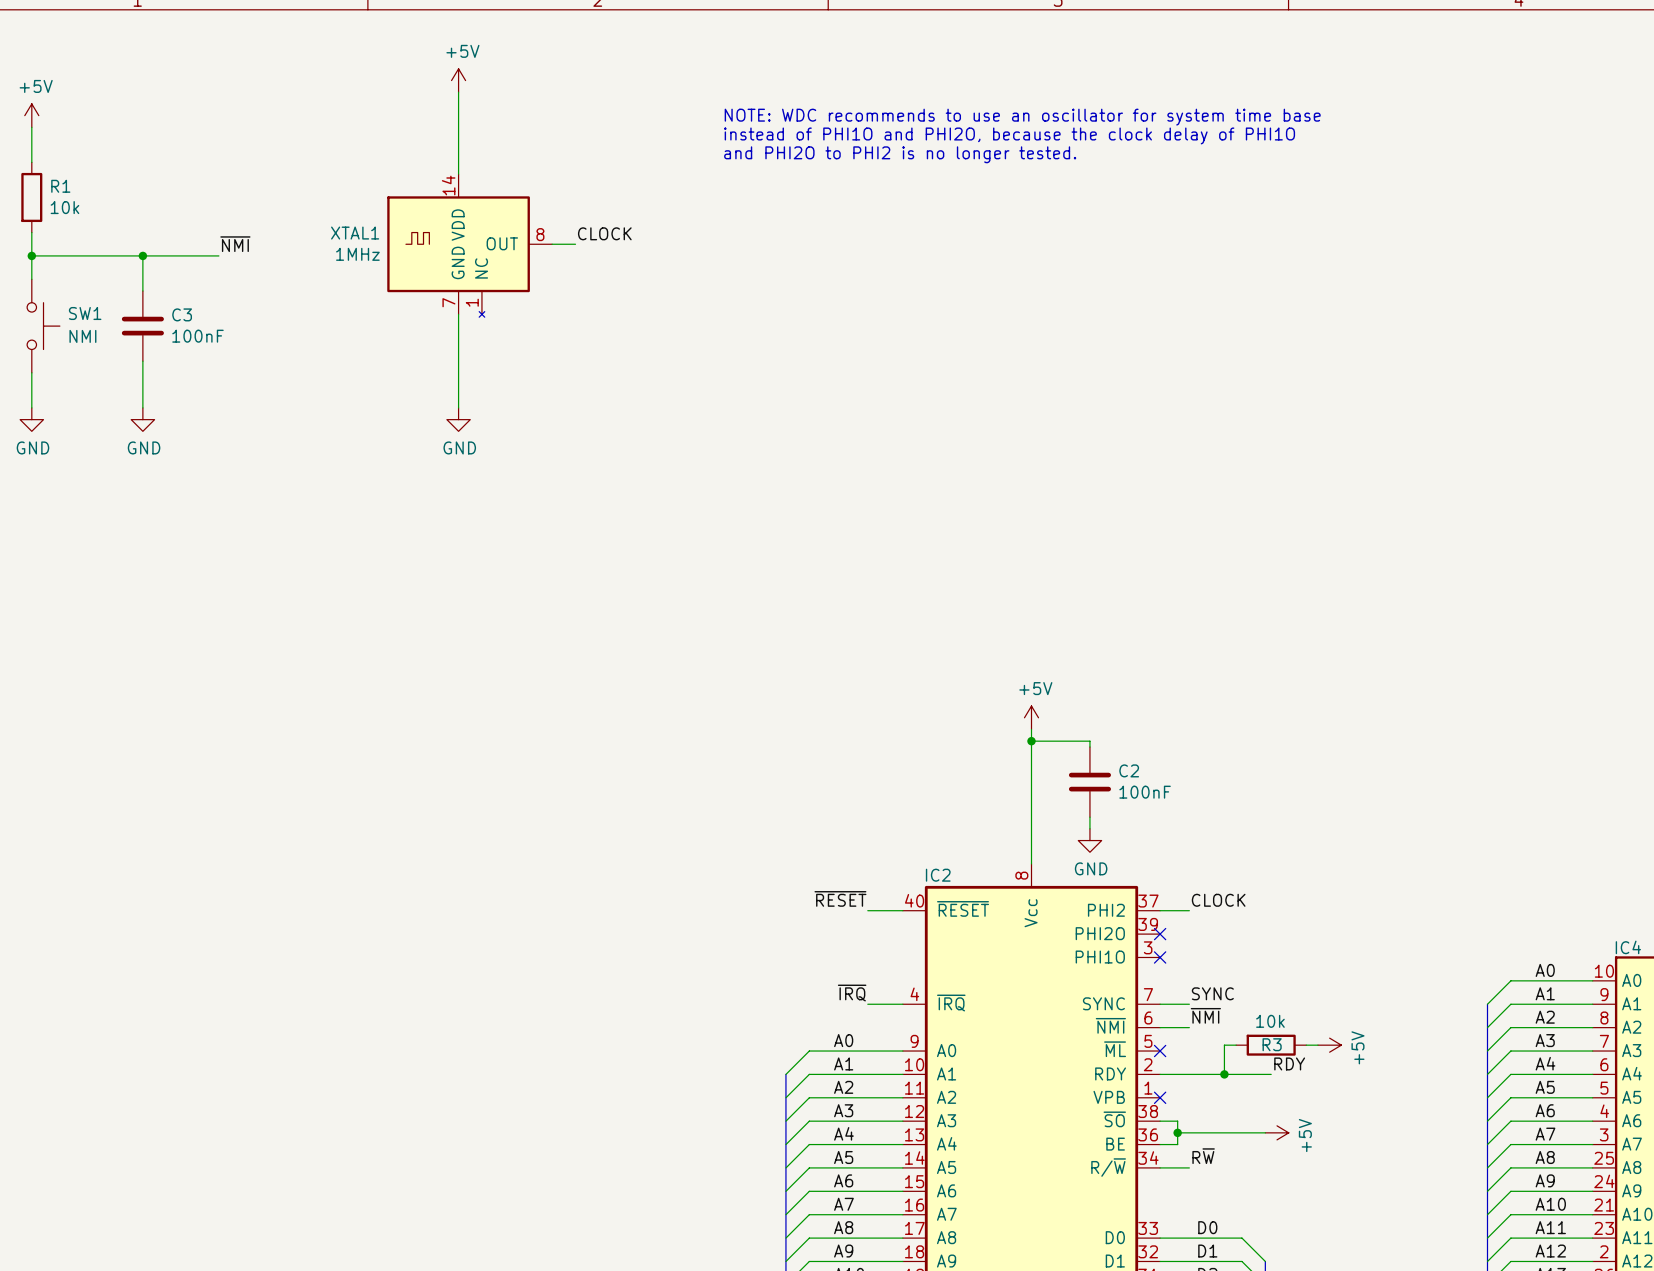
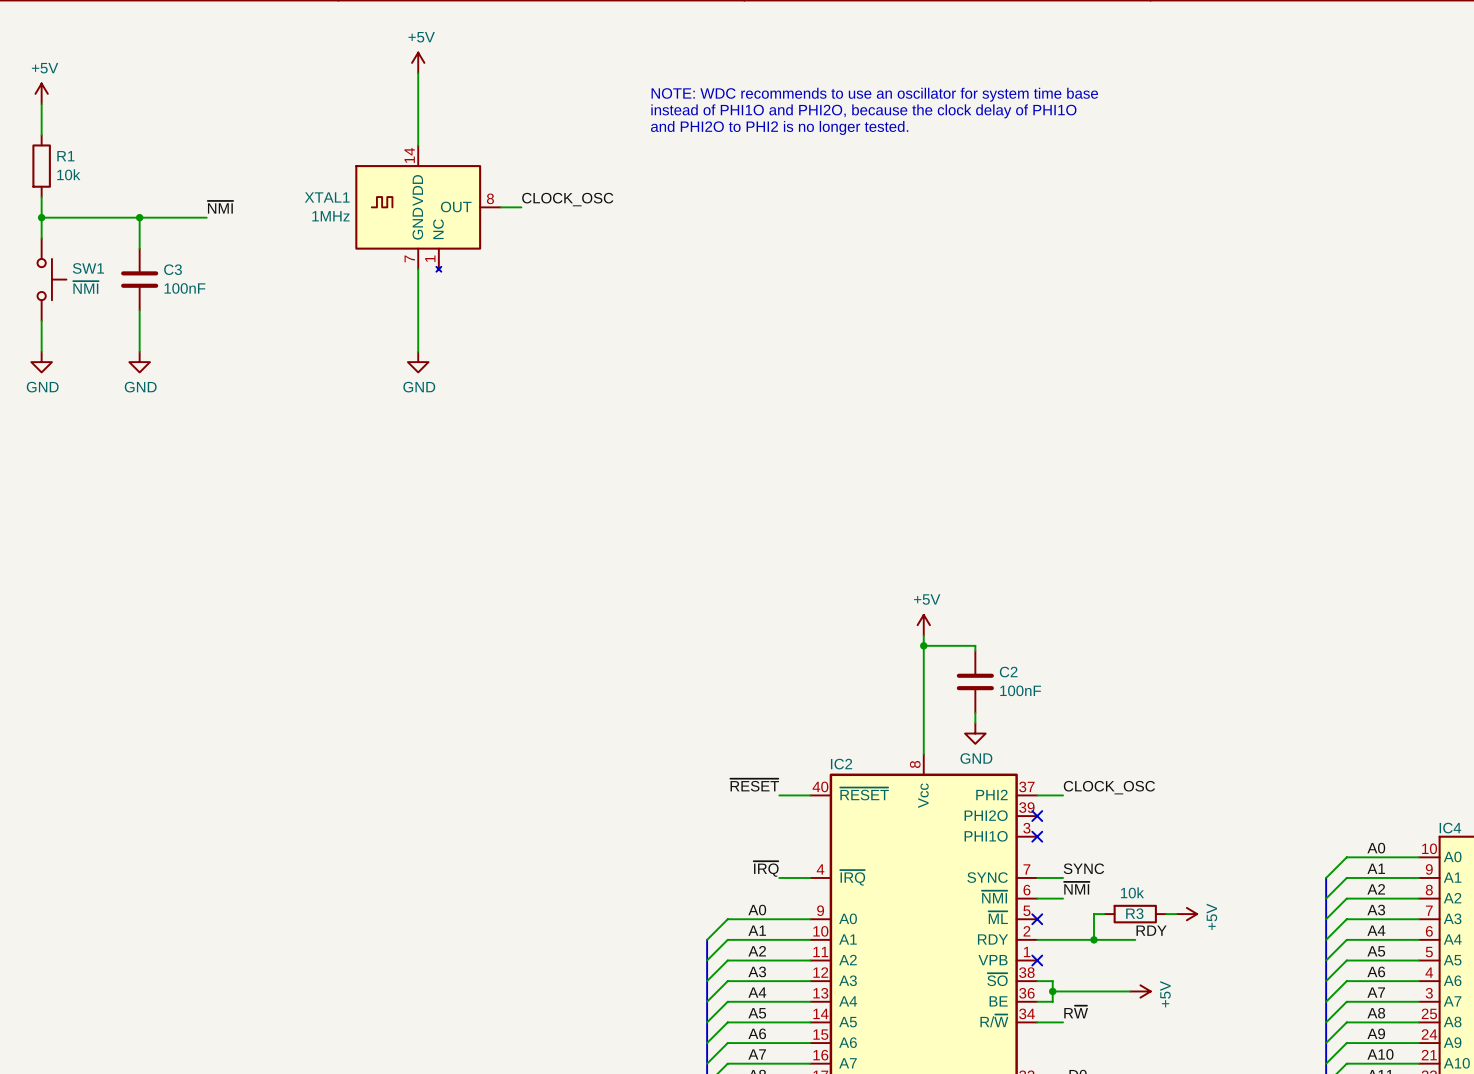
label: CLOCK (604, 233) -> CLOCK_OSC (567, 199)
SW1 value: NMI (82, 336) -> ~{NMI} (85, 287)
label: CLOCK (1218, 900) -> CLOCK_OSC (1109, 787)

